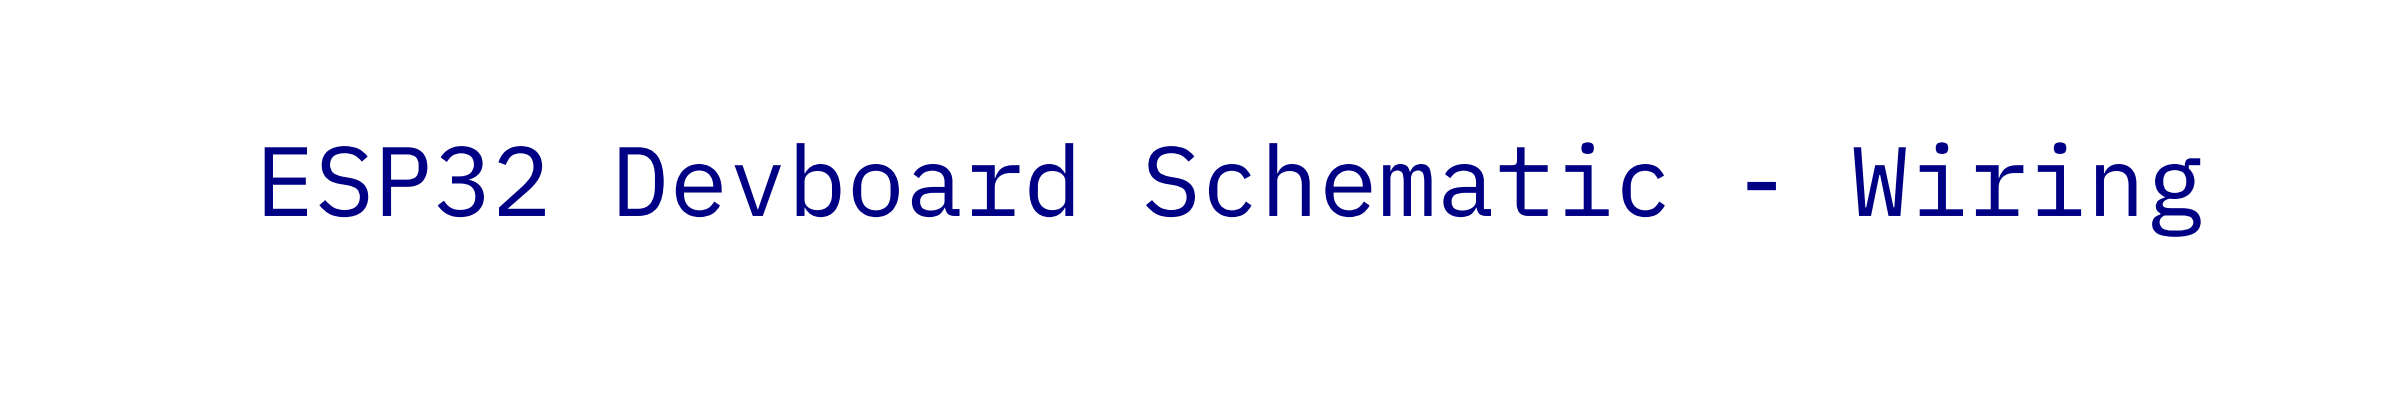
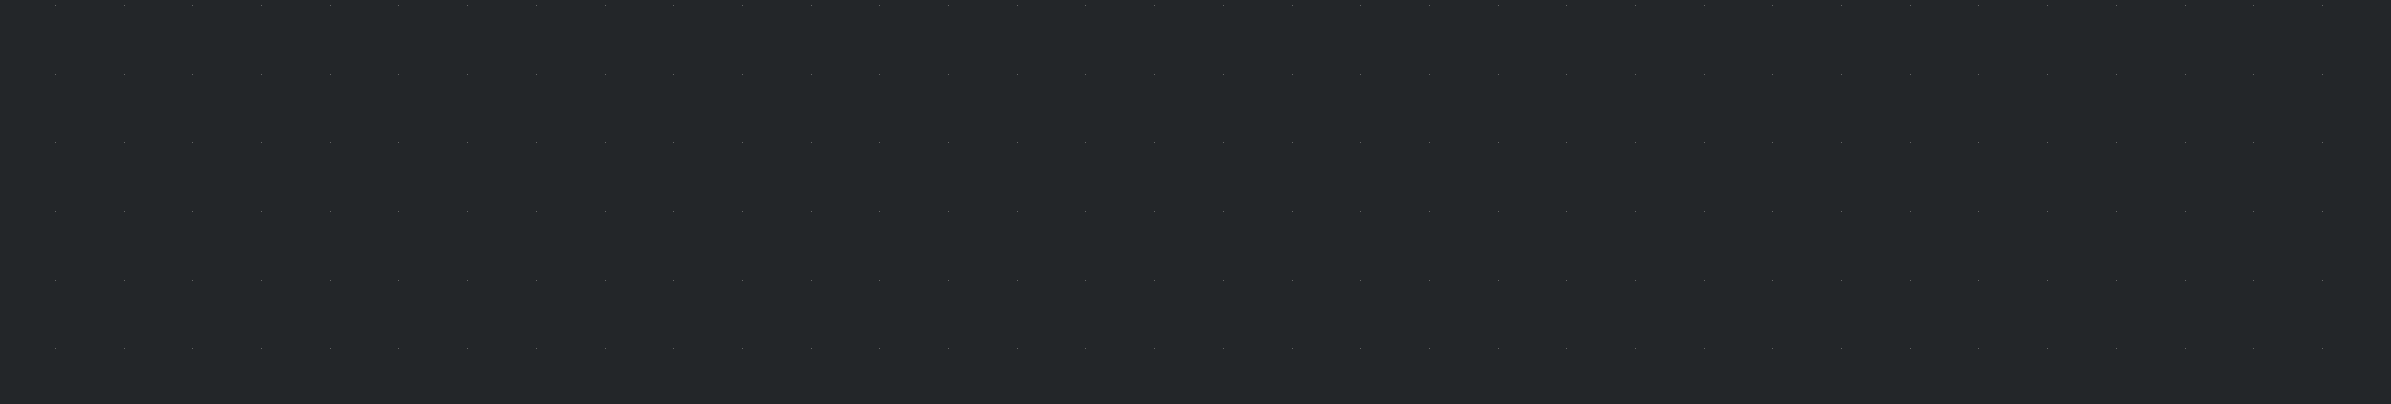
text: ESP32 Devboard Schematic - Wiring (1232, 189) -> none

